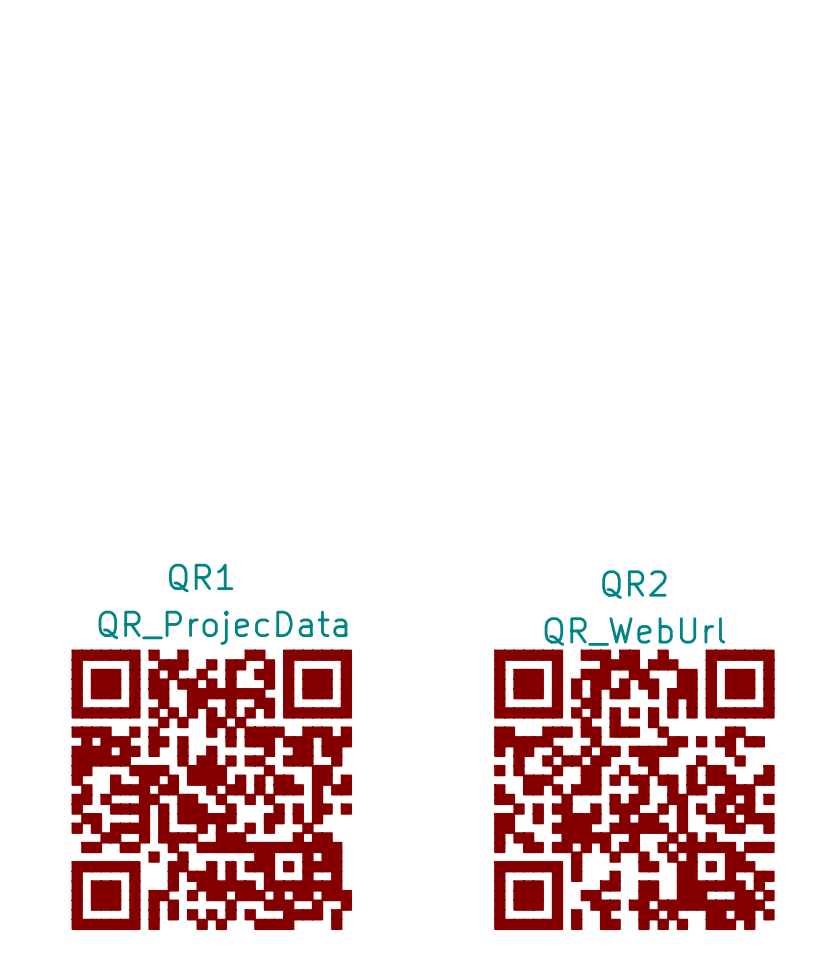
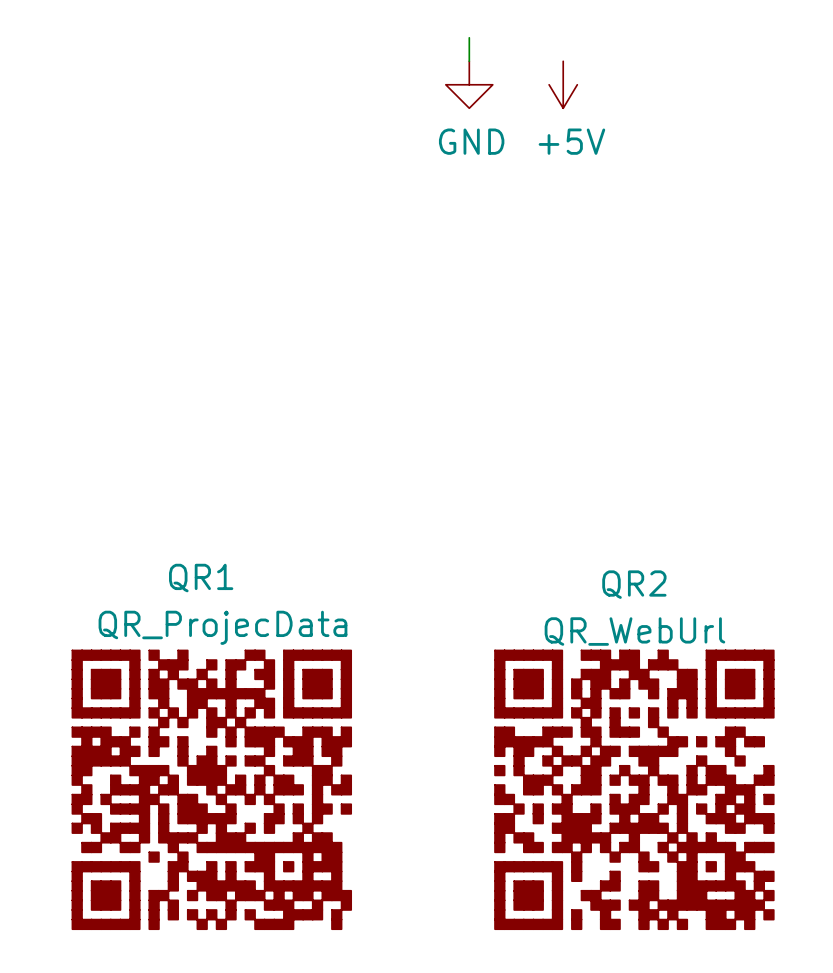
wire: none -> (469, 37) (469, 61)
power symbol: none -> GND (469, 84)
power symbol: none -> +5V (563, 84)

